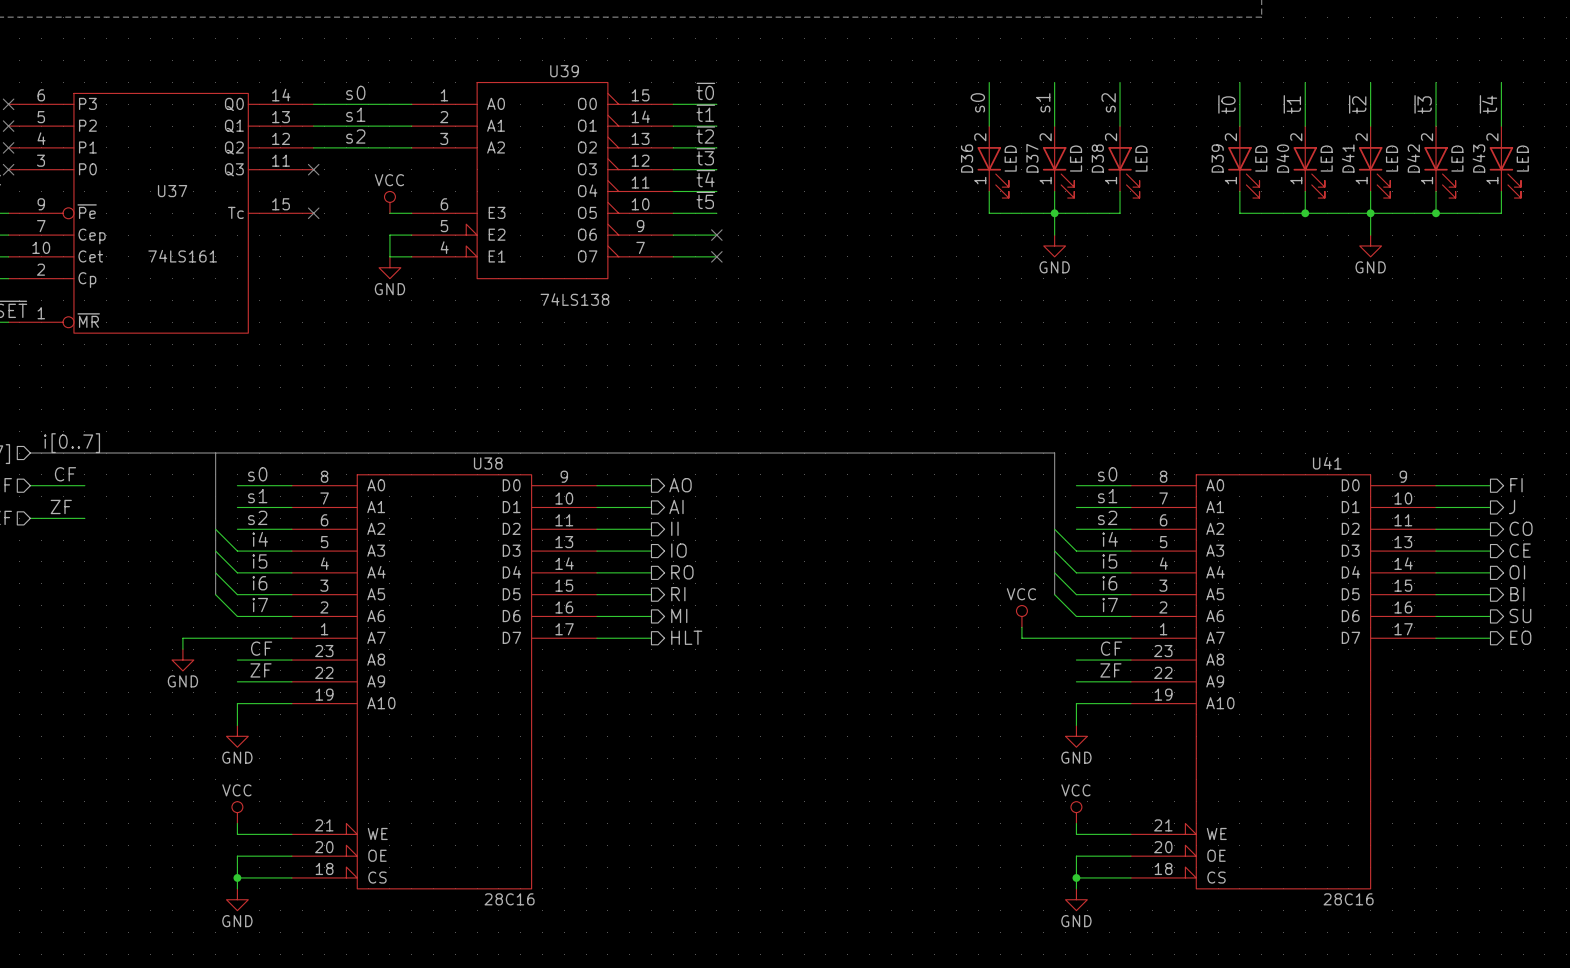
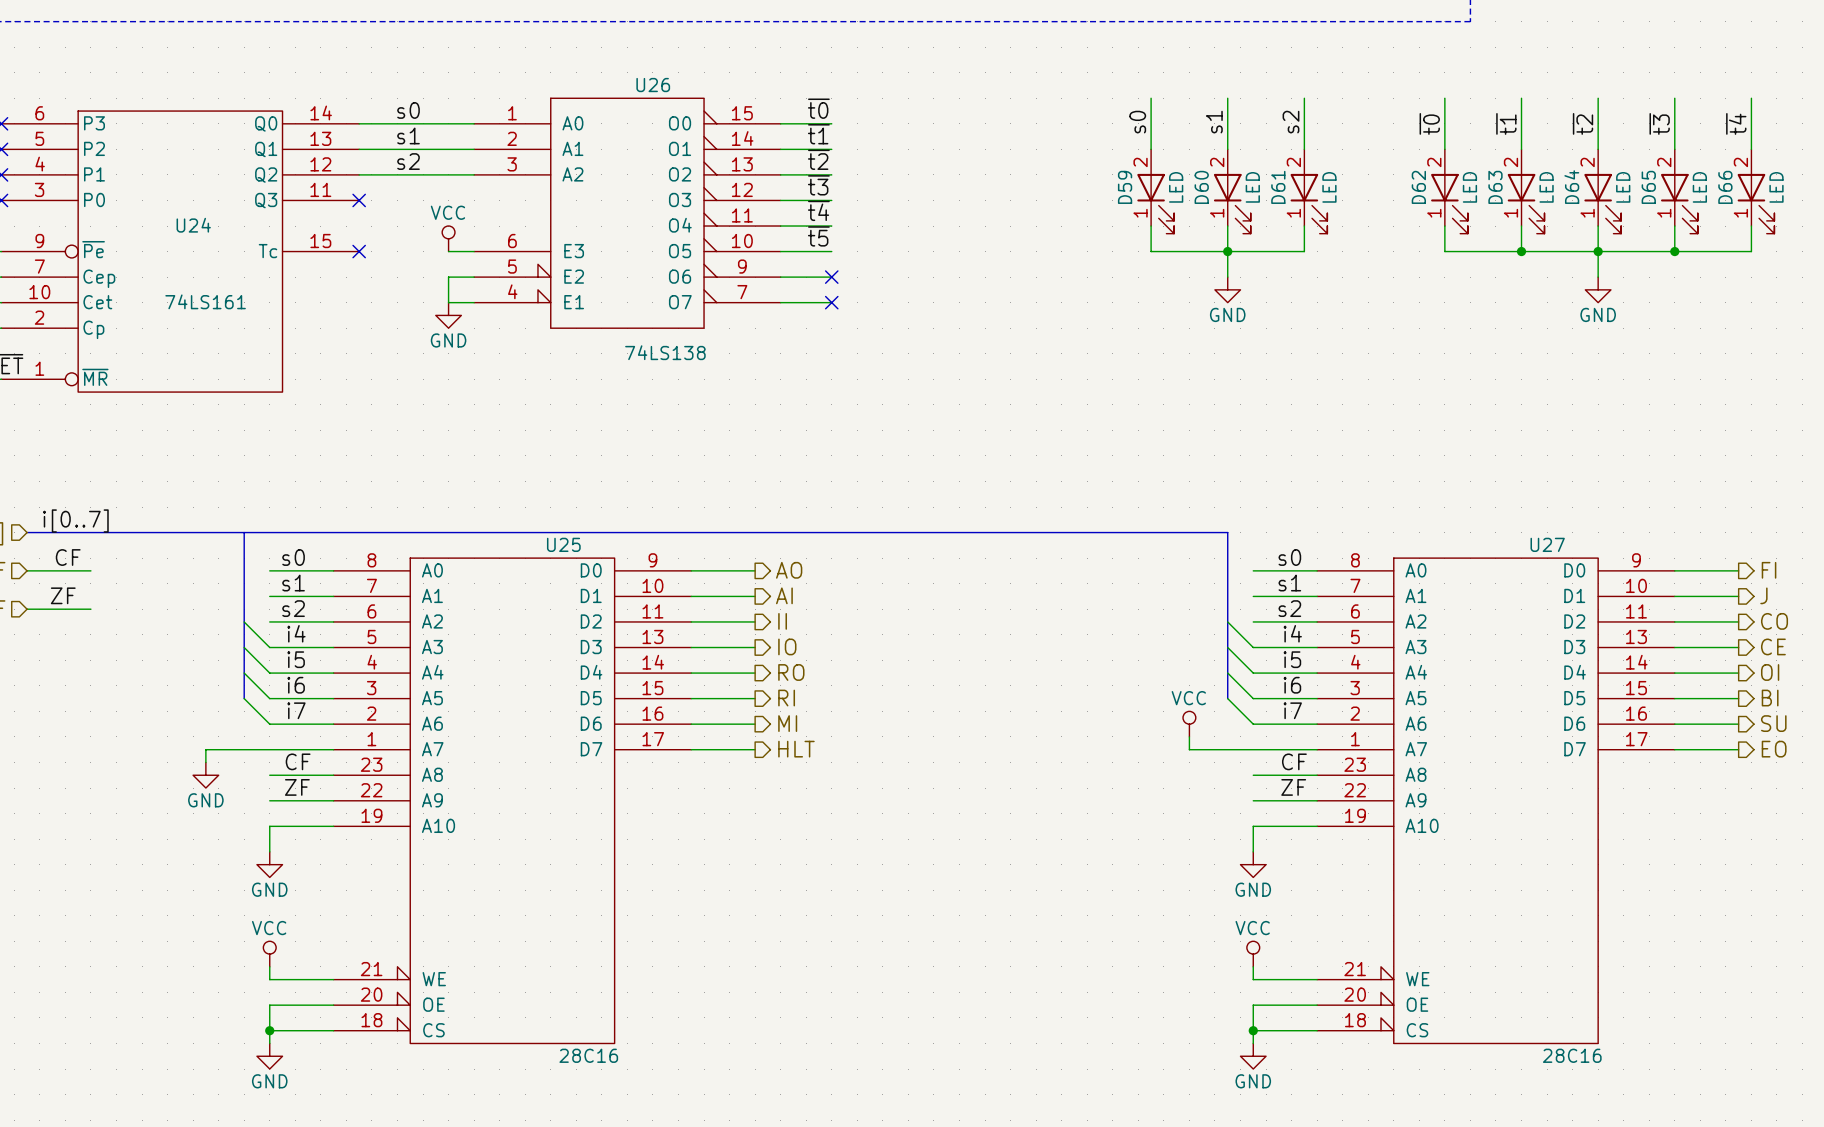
U39 name: U39 (564, 71) -> U26 (653, 85)
D36 name: D36 (967, 158) -> D59 (1125, 187)
D37 name: D37 (1032, 158) -> D60 (1201, 187)
D38 name: D38 (1097, 158) -> D61 (1278, 187)
D39 name: D39 (1217, 158) -> D62 (1418, 187)
D40 name: D40 (1282, 158) -> D63 (1495, 187)
D41 name: D41 (1348, 158) -> D64 (1571, 187)
D42 name: D42 (1413, 158) -> D65 (1648, 187)
D43 name: D43 (1478, 158) -> D66 (1725, 187)
U37 name: U37 (172, 191) -> U24 (193, 225)
U38 name: U38 (488, 463) -> U25 (563, 544)
U41 name: U41 (1327, 463) -> U27 (1547, 544)

